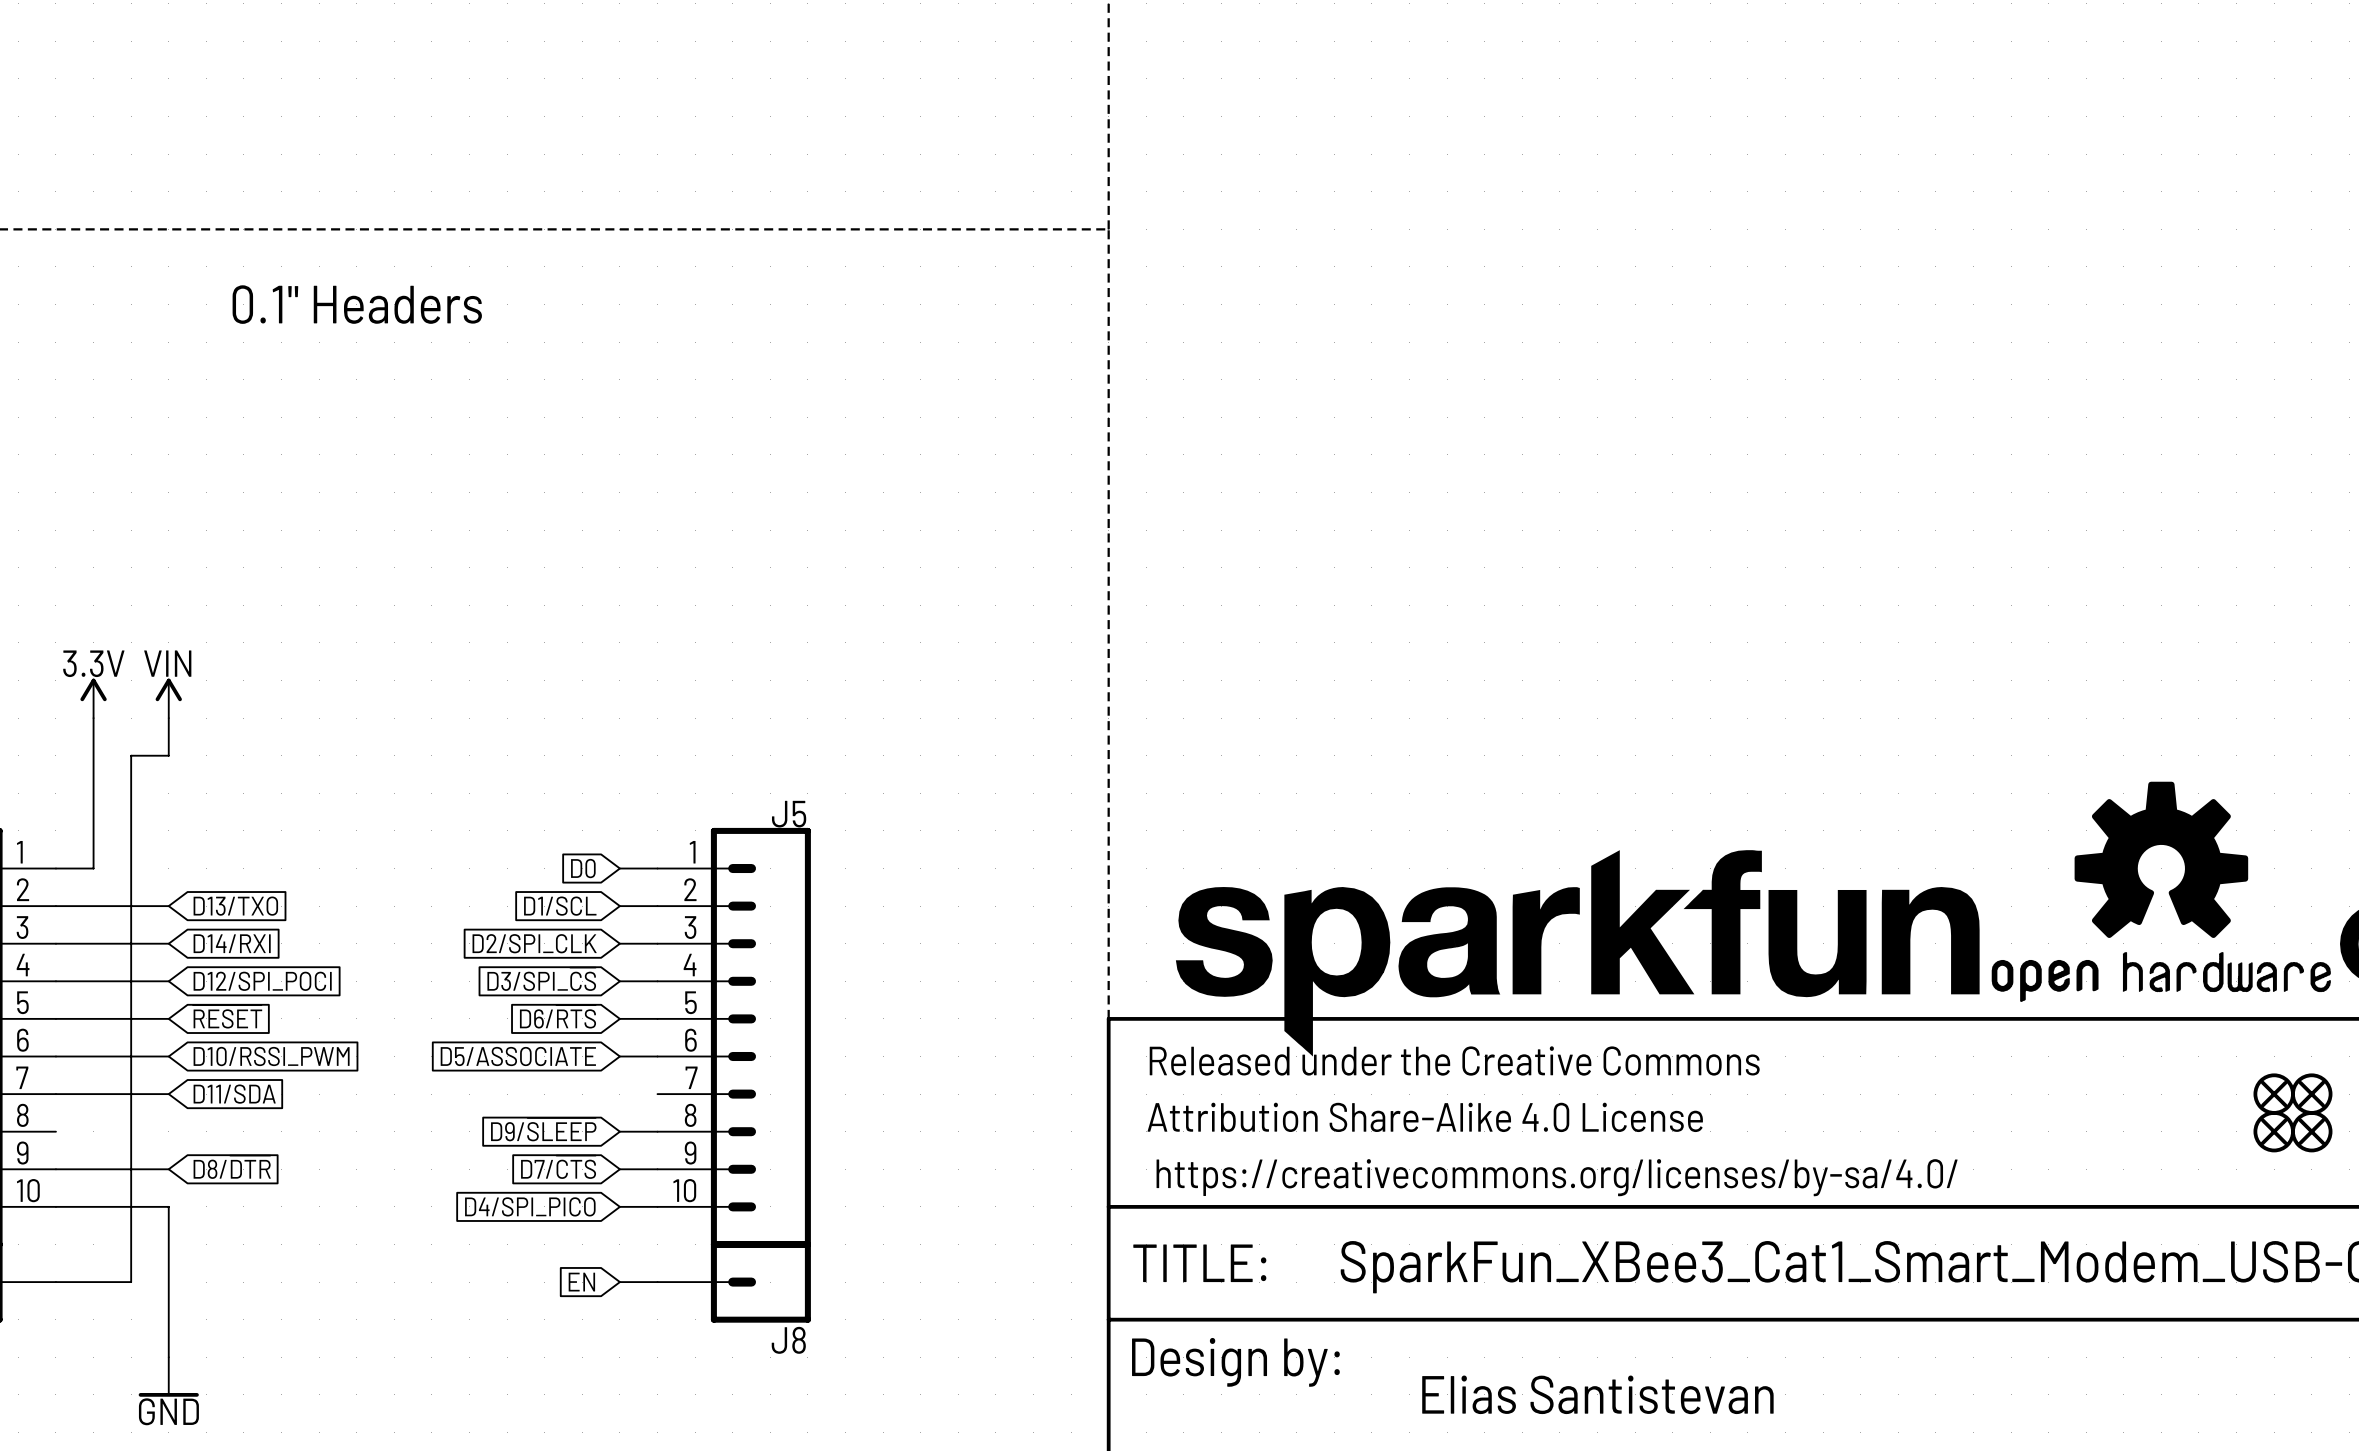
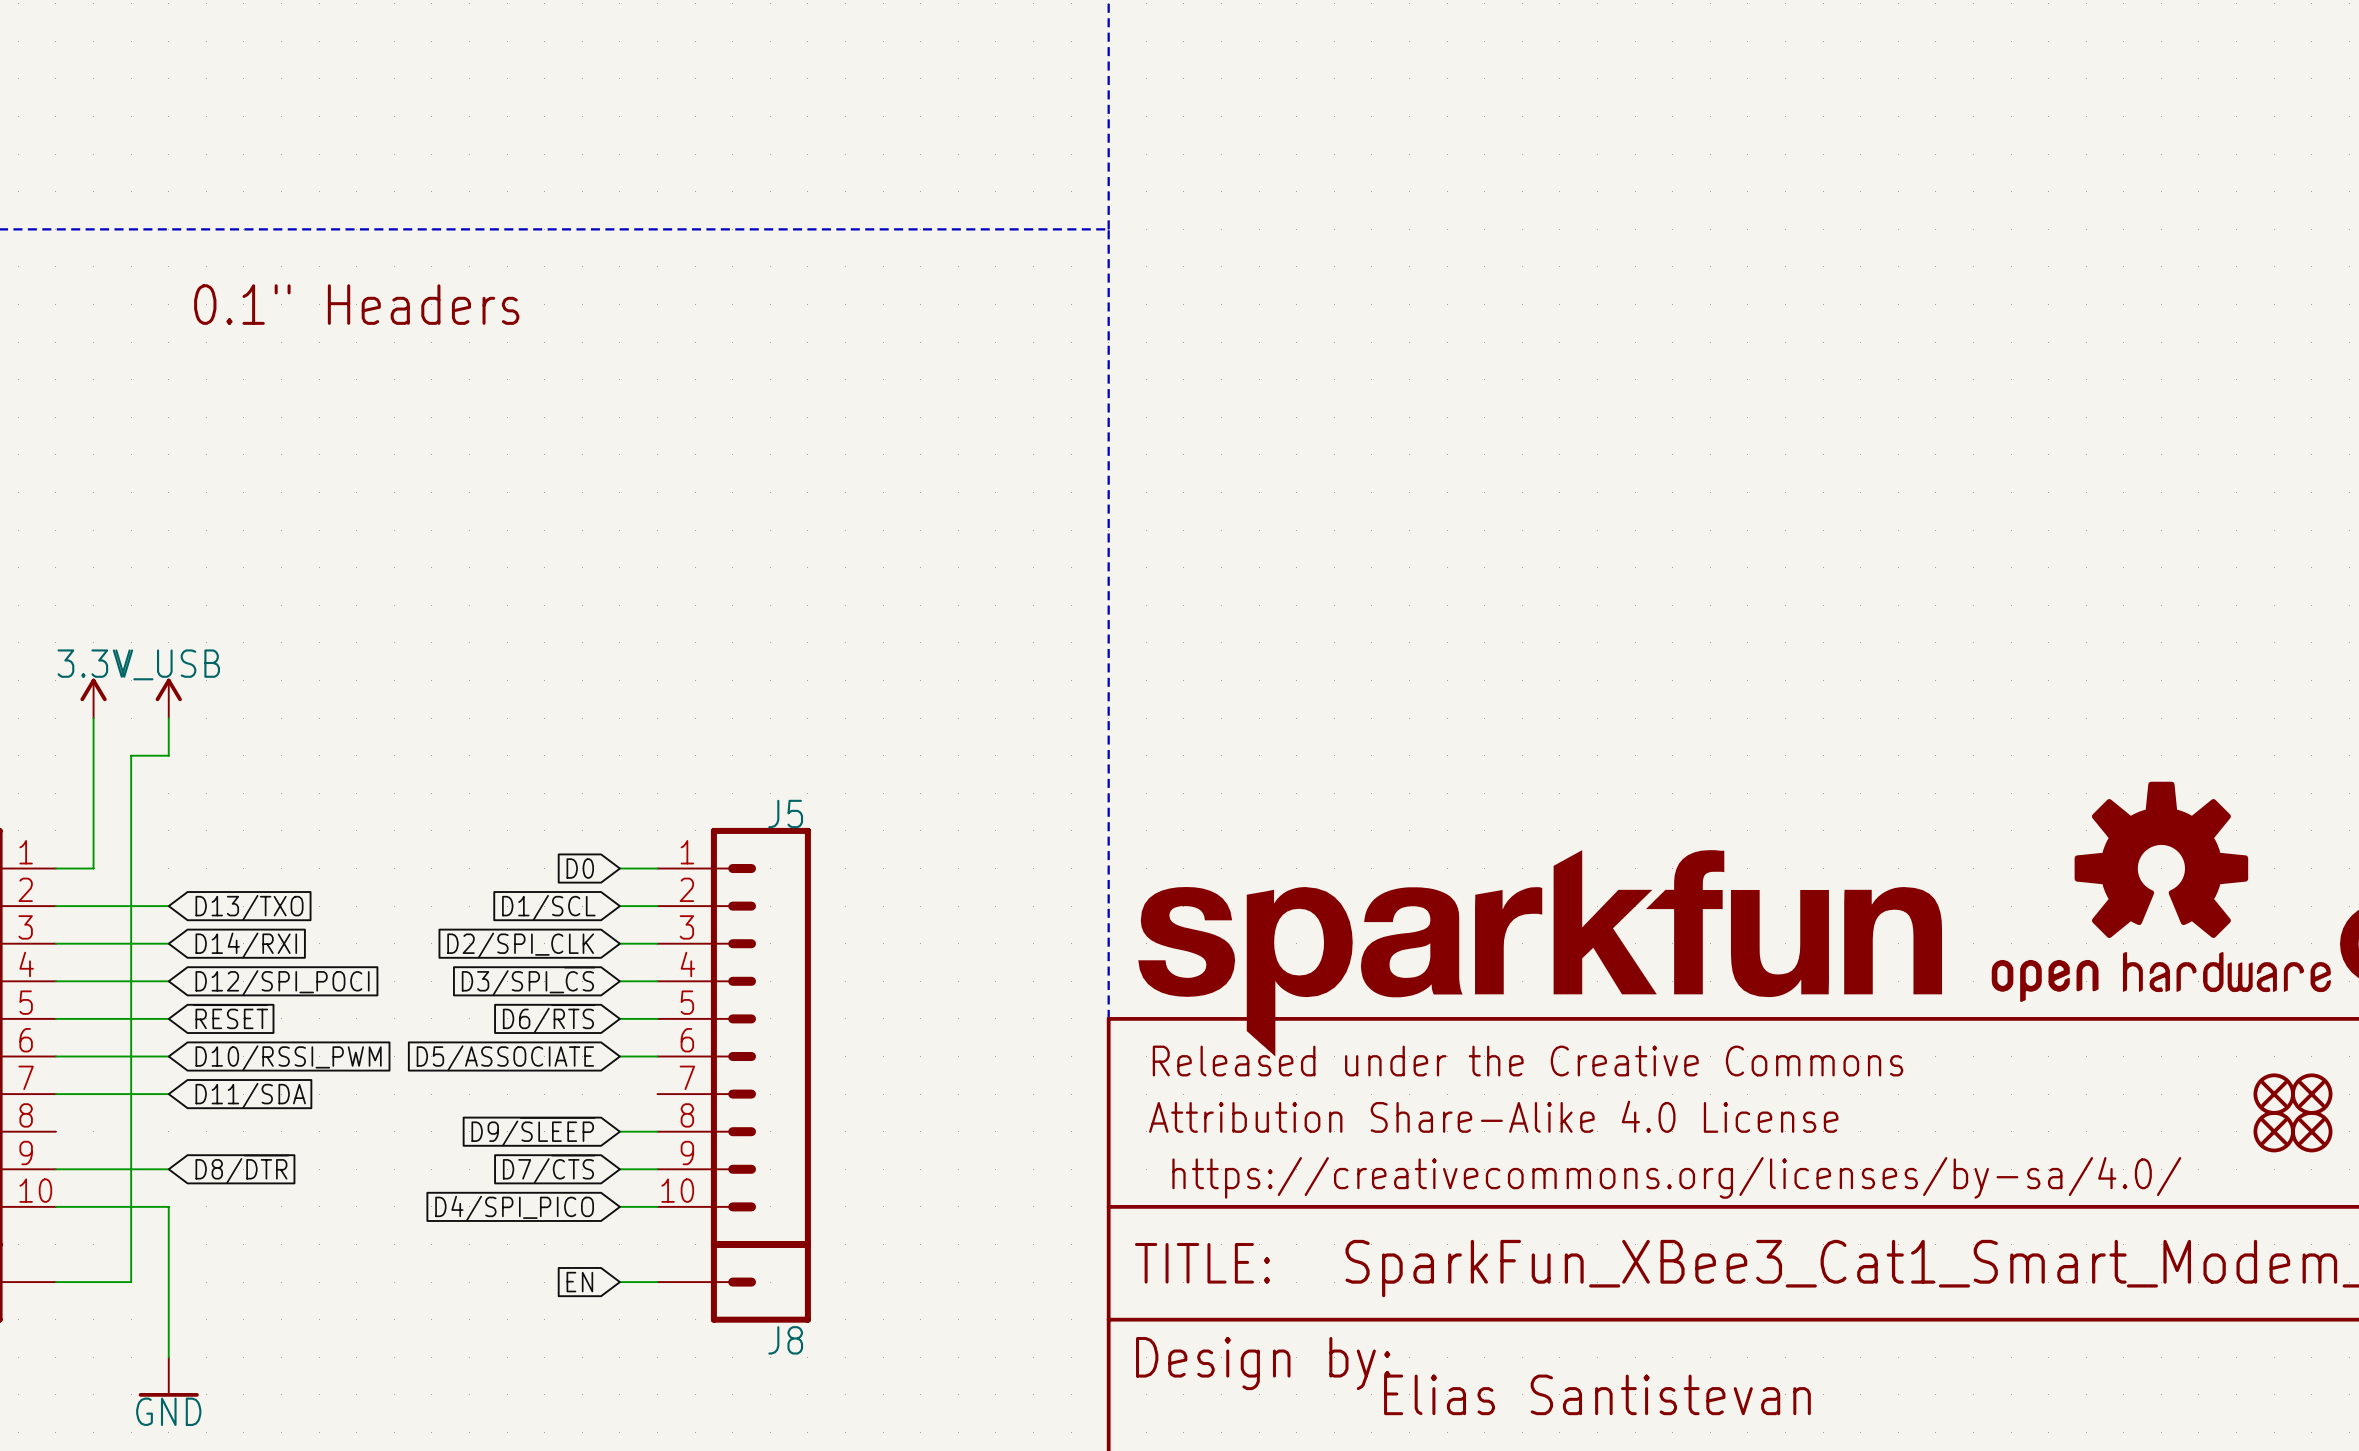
power symbol: VIN (168, 698) -> V_USB (168, 698)
part position: (1577, 953) -> (1540, 953)

